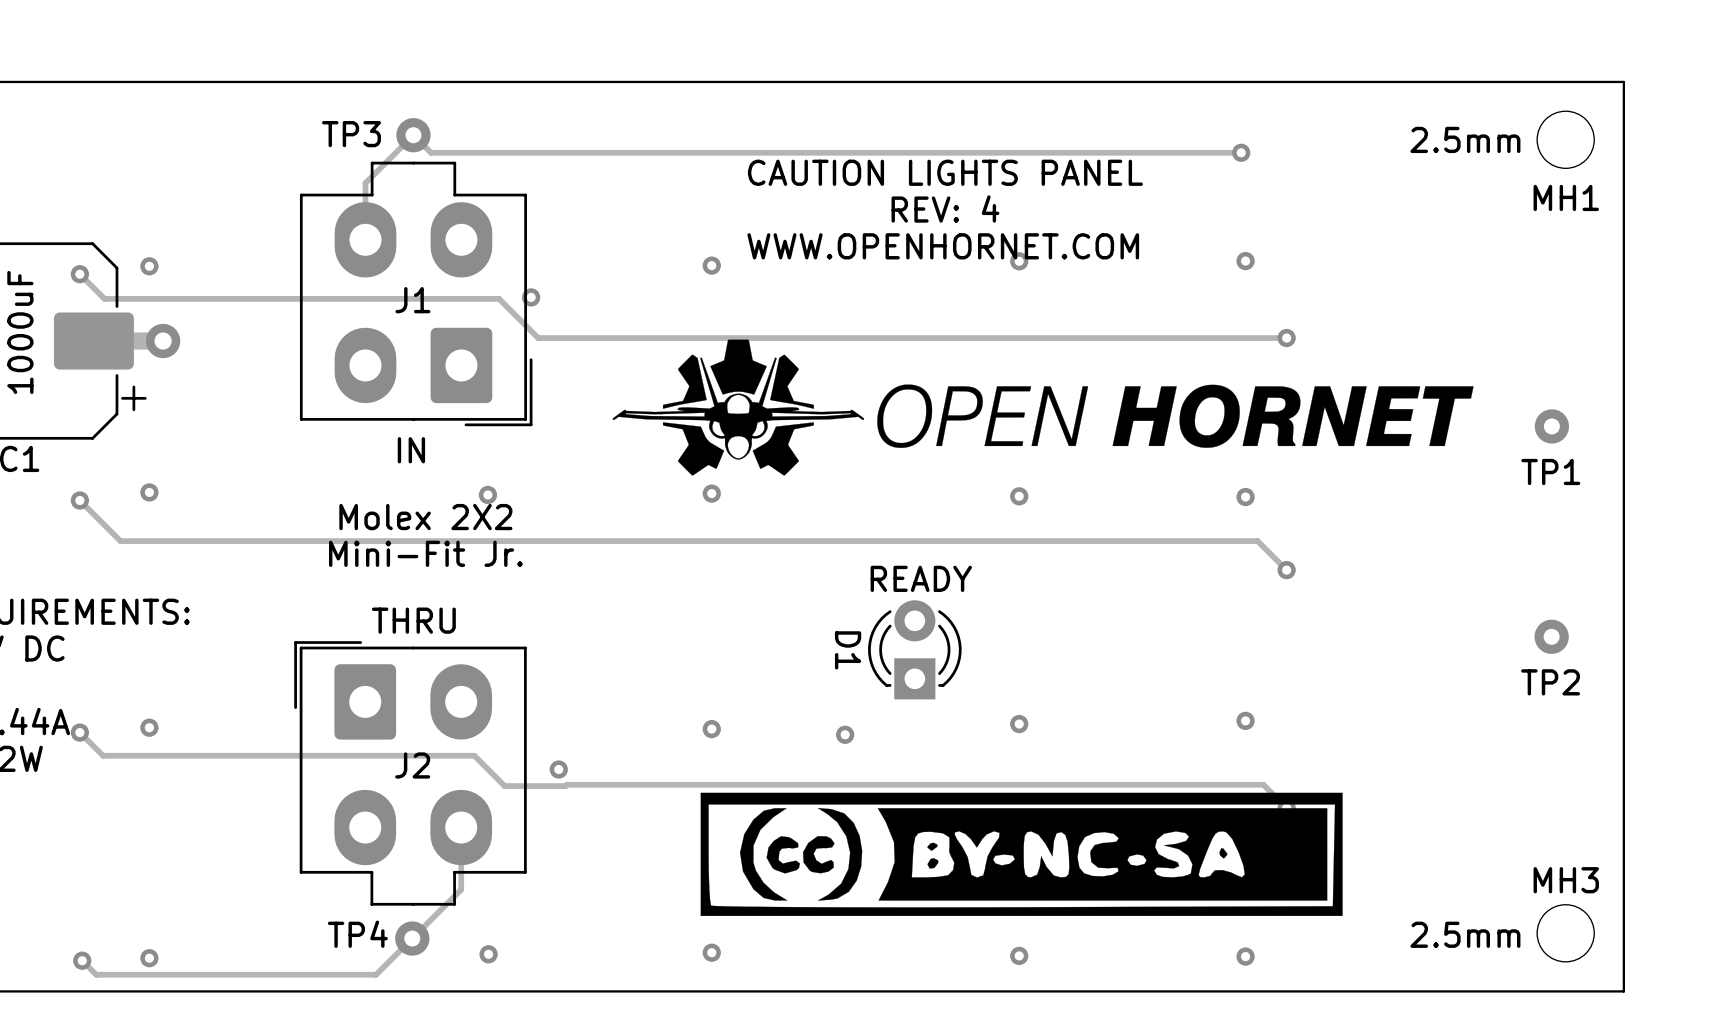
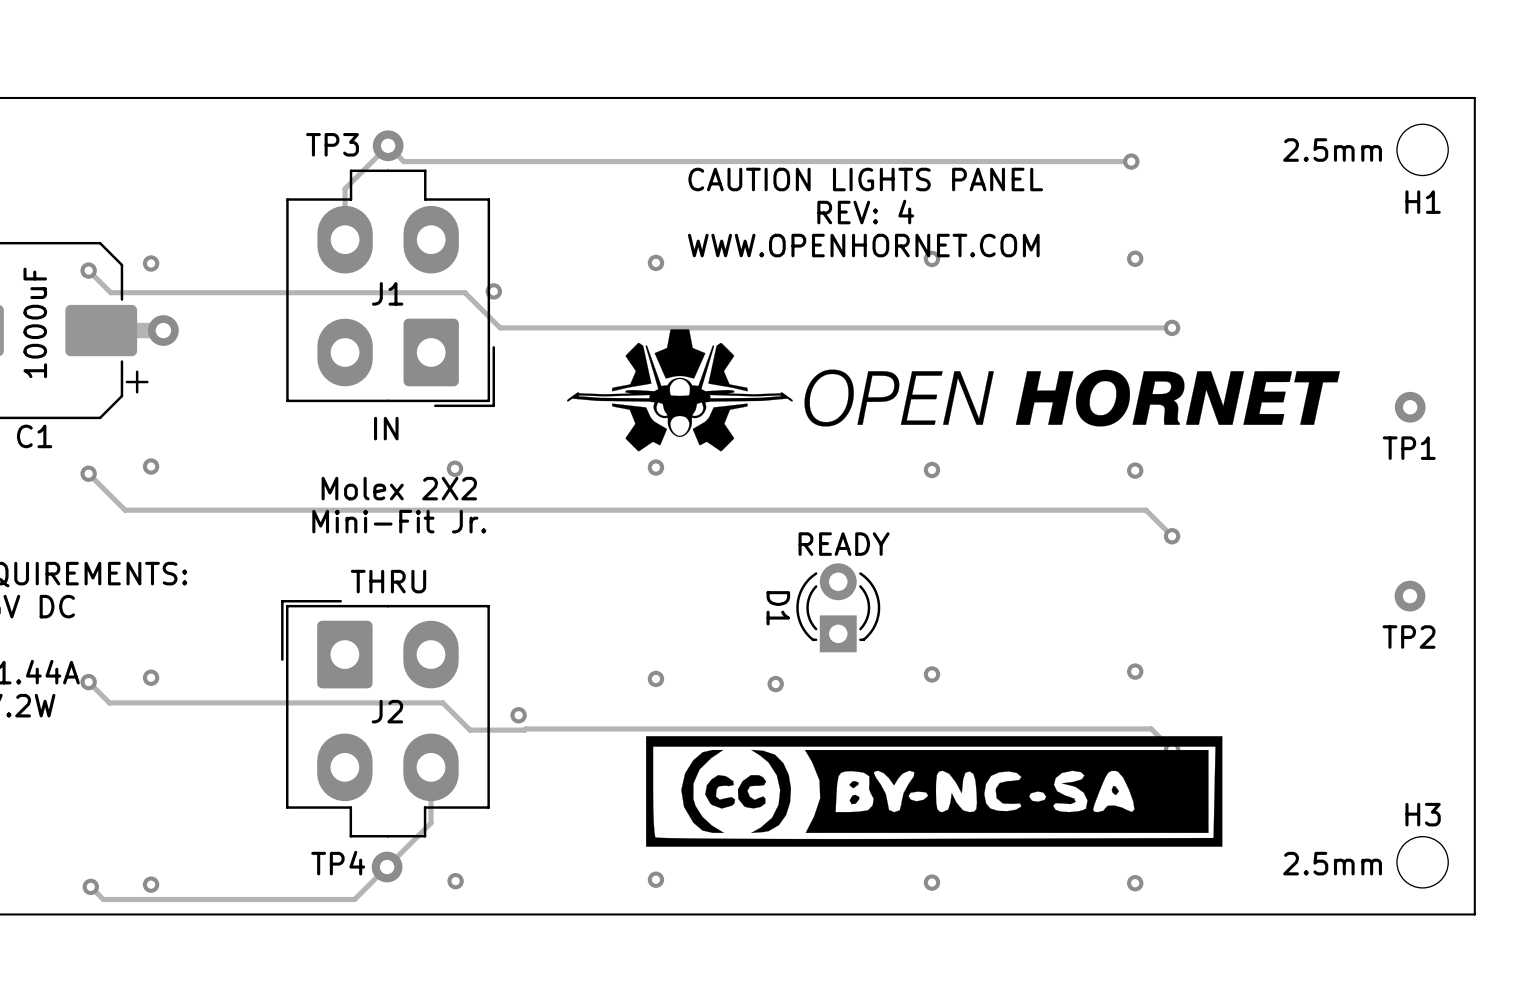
MH1 name: MH1 (1566, 197) -> H1 (1423, 202)
MH3 name: MH3 (1566, 880) -> H3 (1423, 814)

